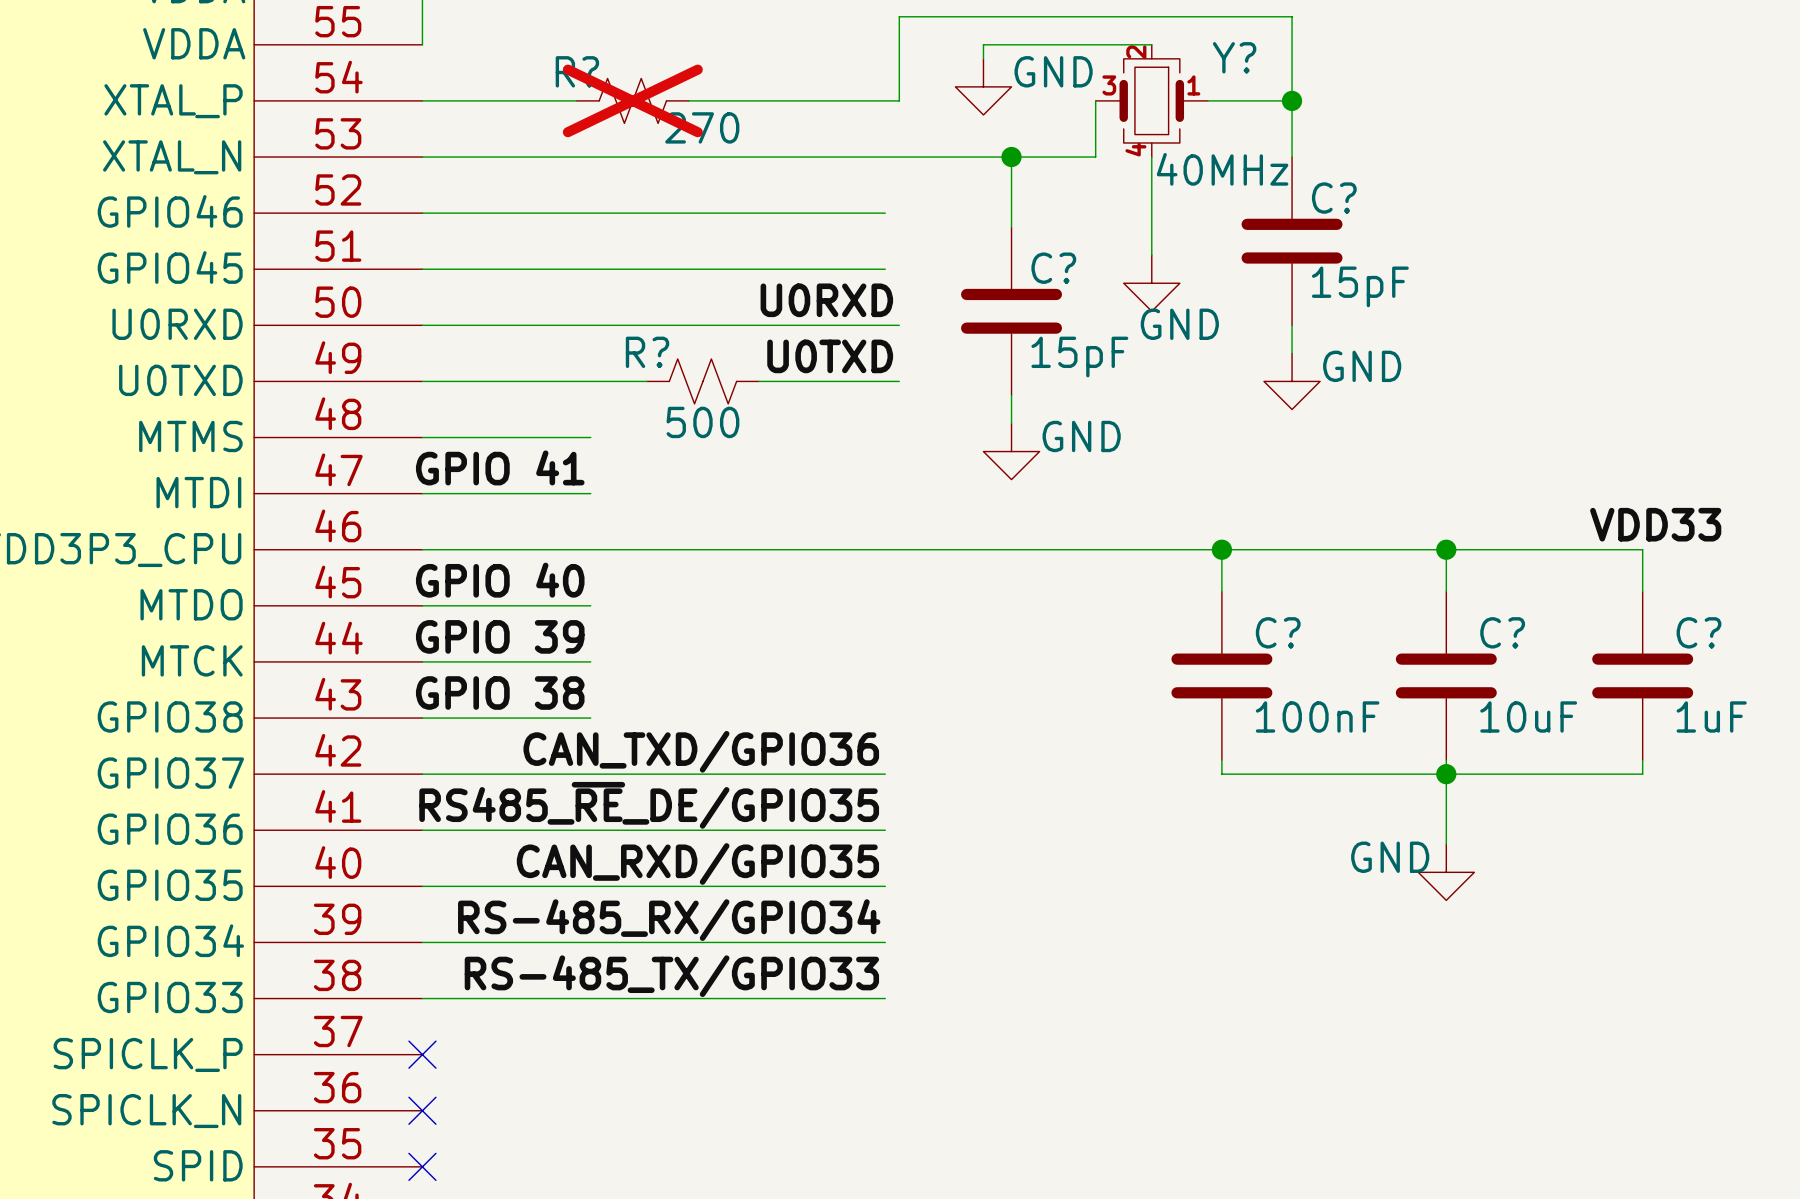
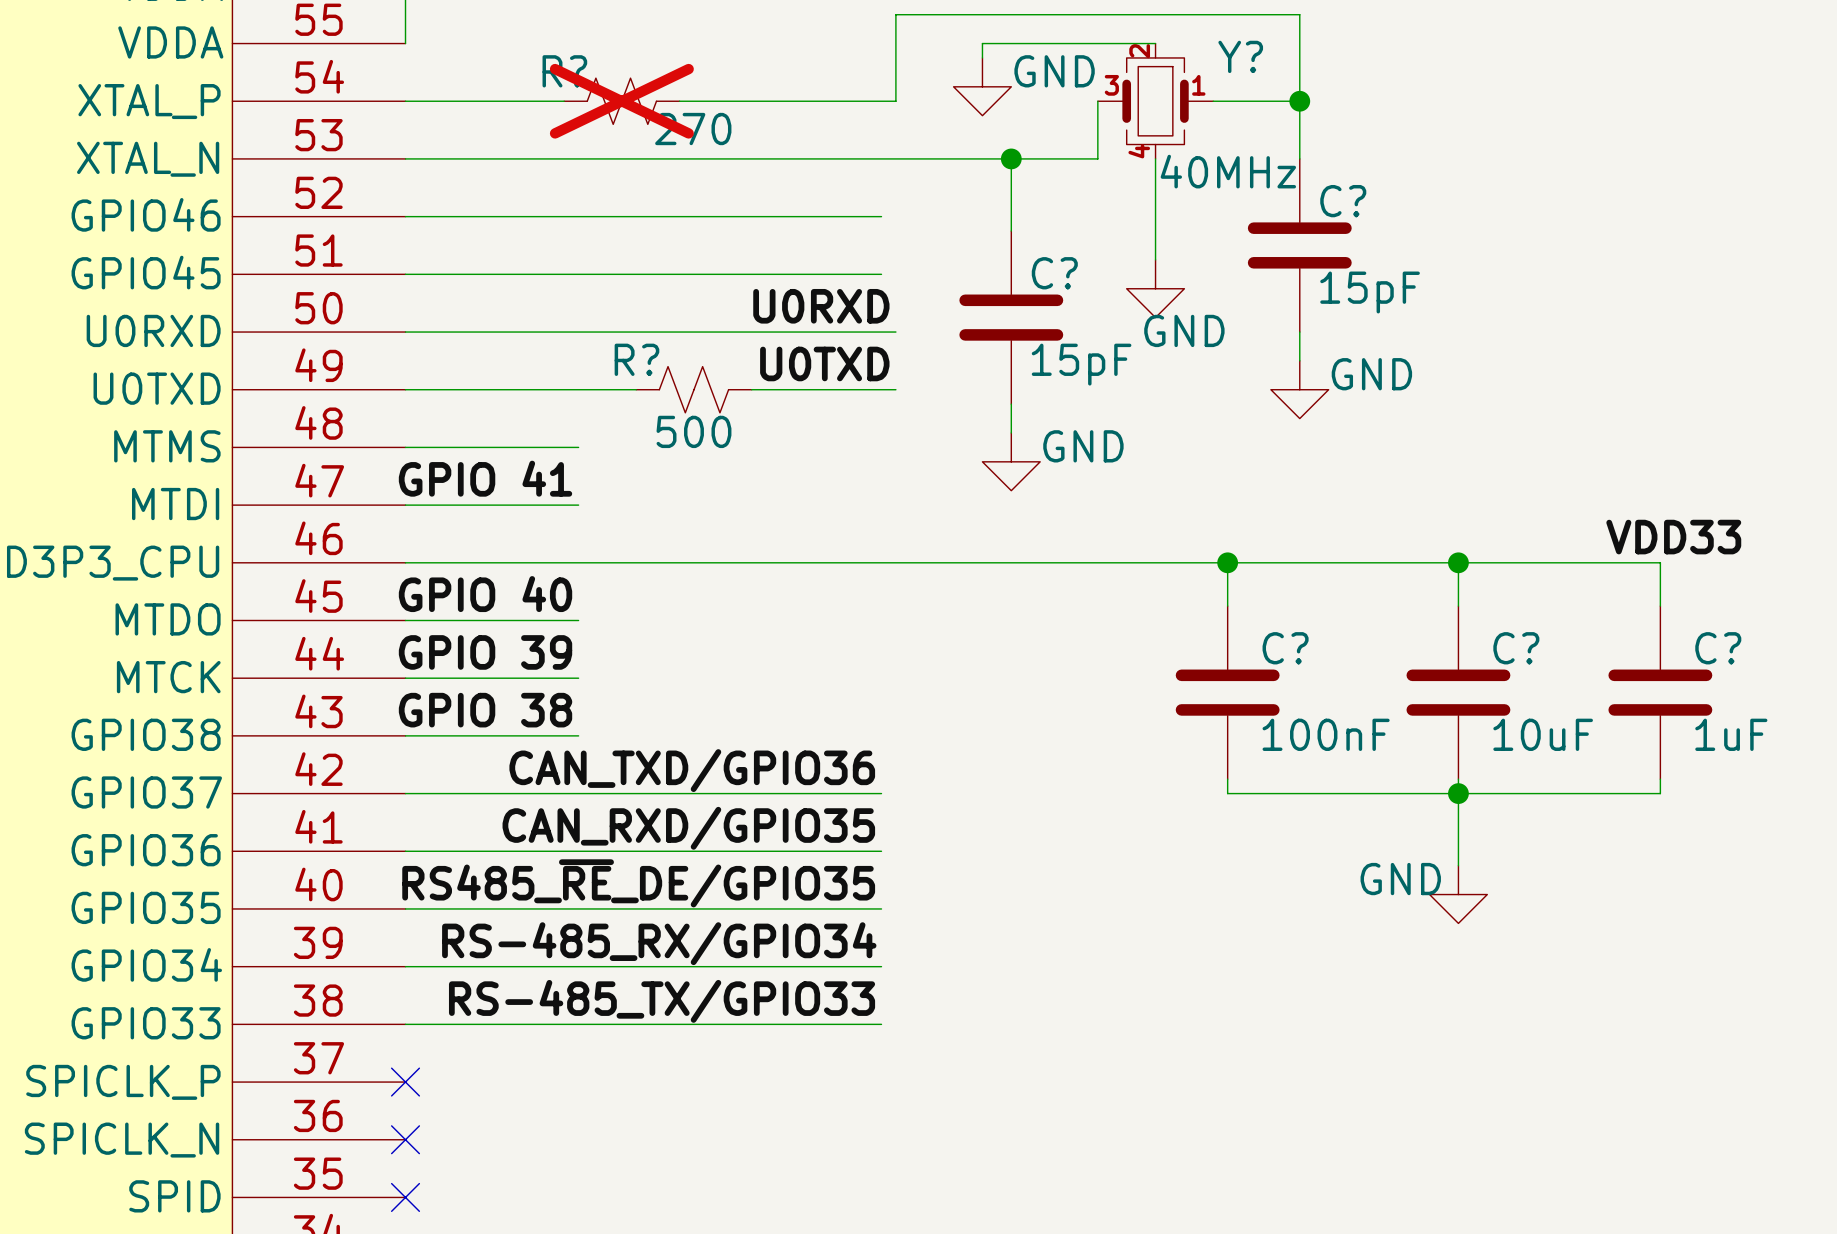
label: RS485_~{RE}_DE/GPIO35 (649, 805) -> CAN_RXD/GPIO35 (688, 828)
label: CAN_RXD/GPIO35 (697, 863) -> RS485_~{RE}_DE/GPIO35 (638, 883)

